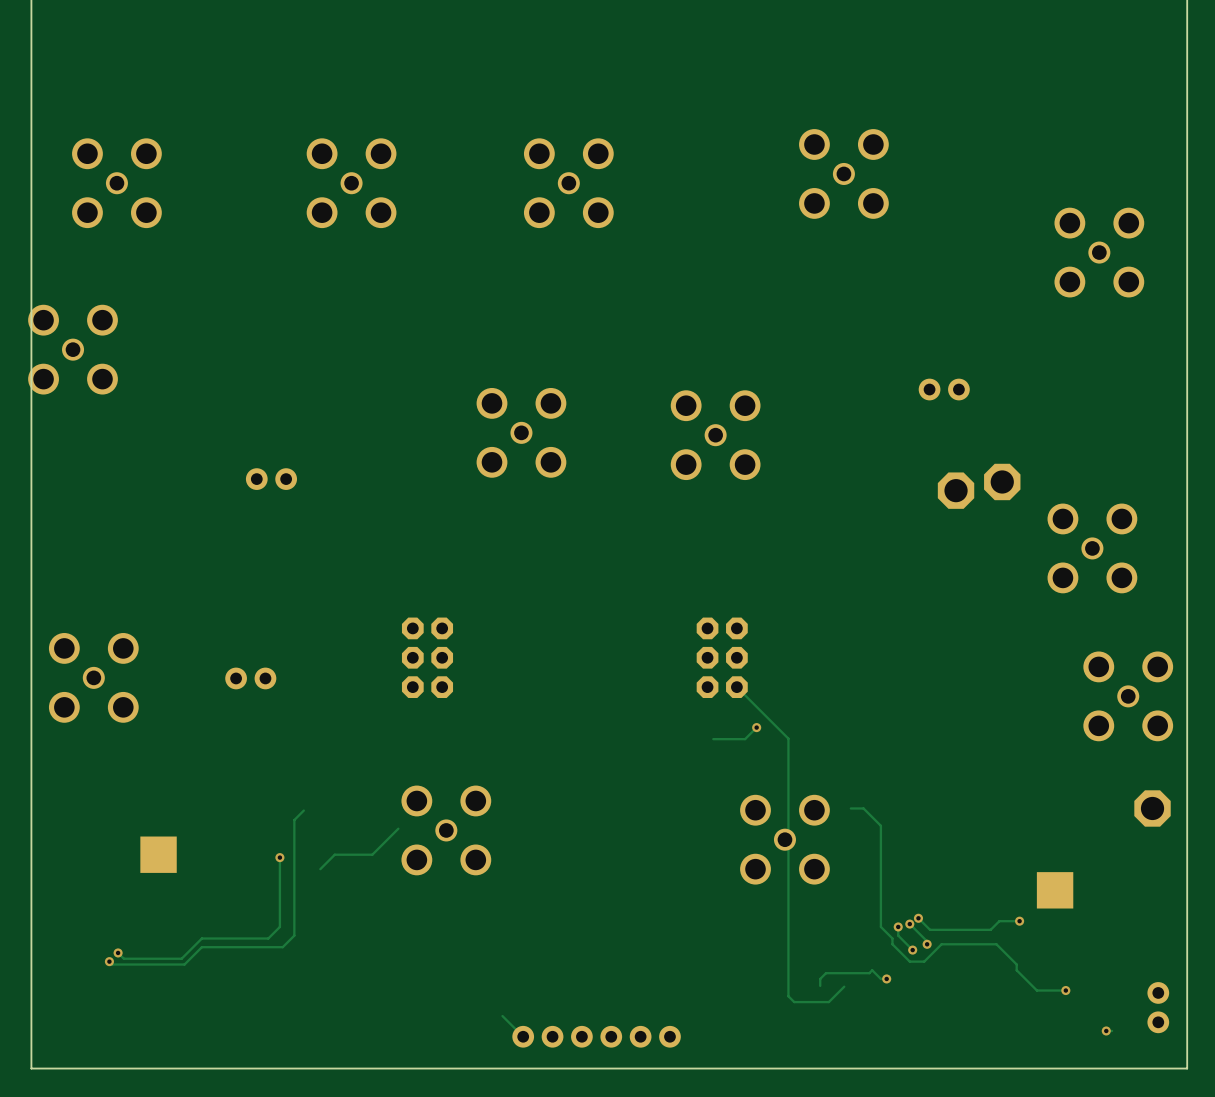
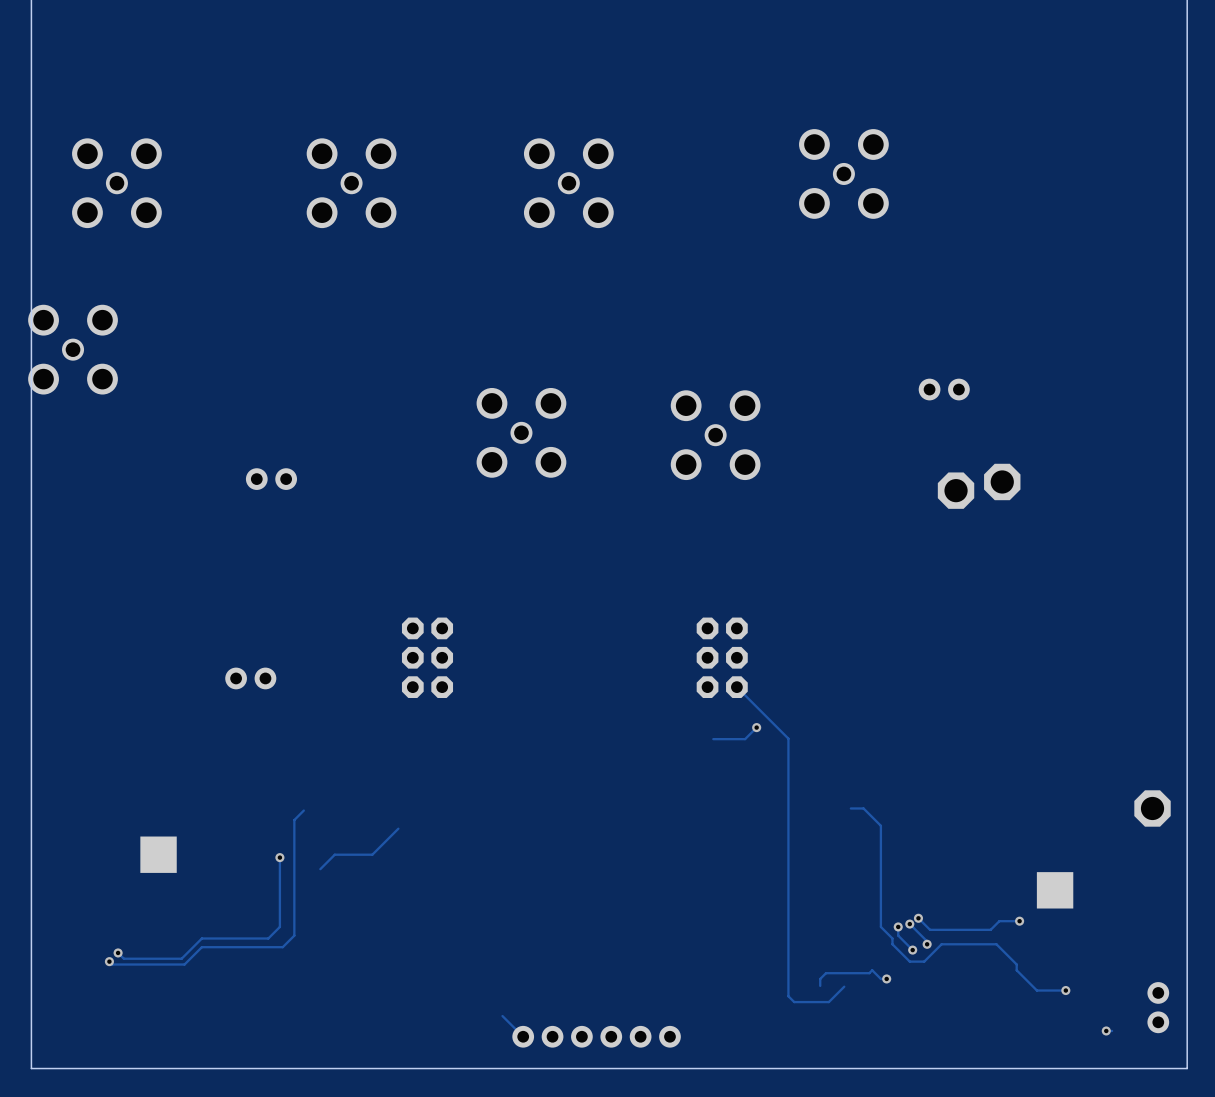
part: (1099, 252) -> none
part: (1092, 548) -> none
part: (93, 677) -> none
part: (1128, 696) -> none
part: (446, 830) -> none
part: (784, 839) -> none

